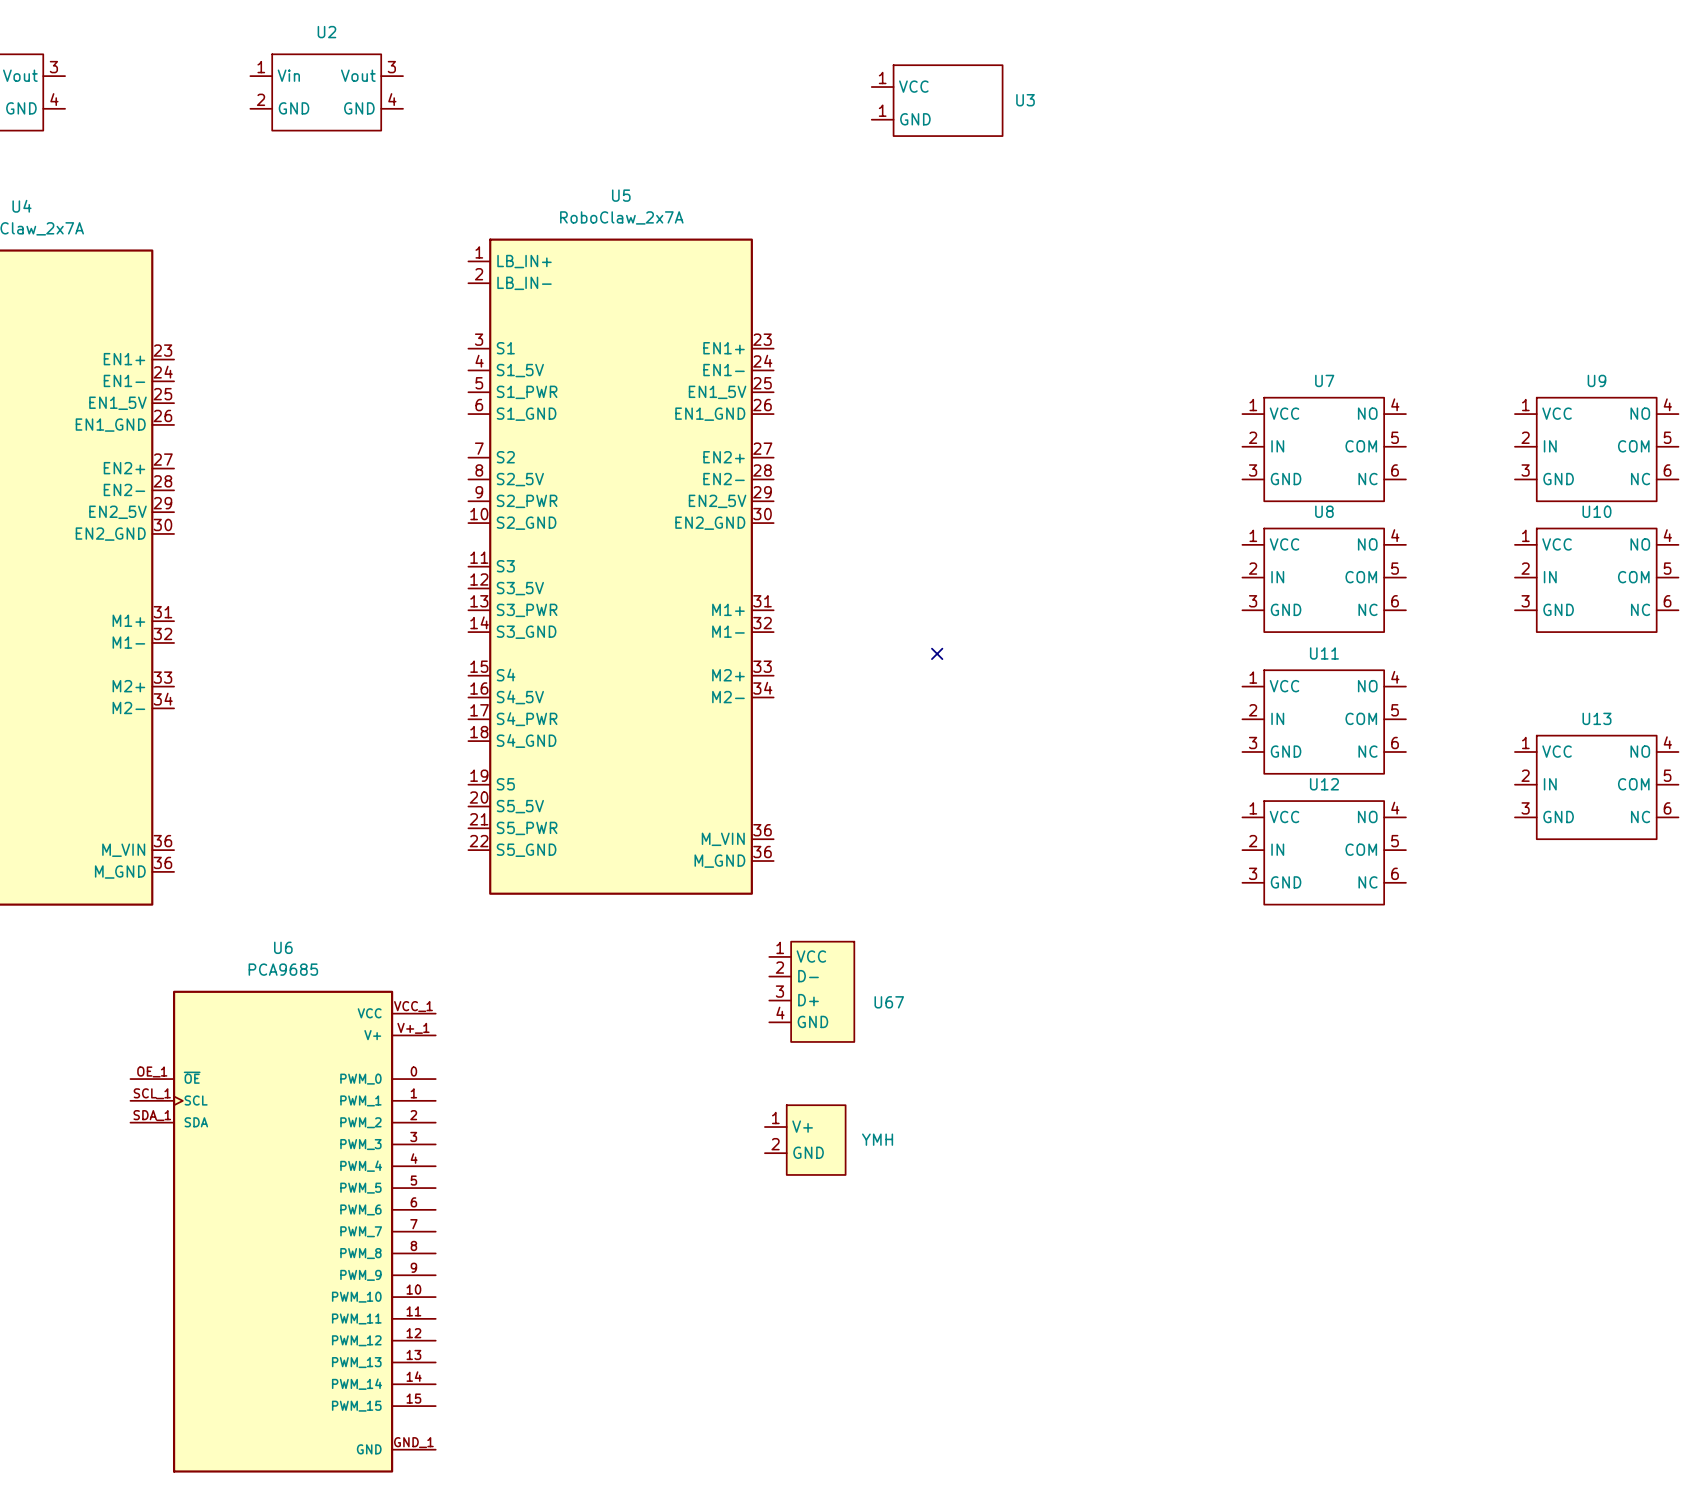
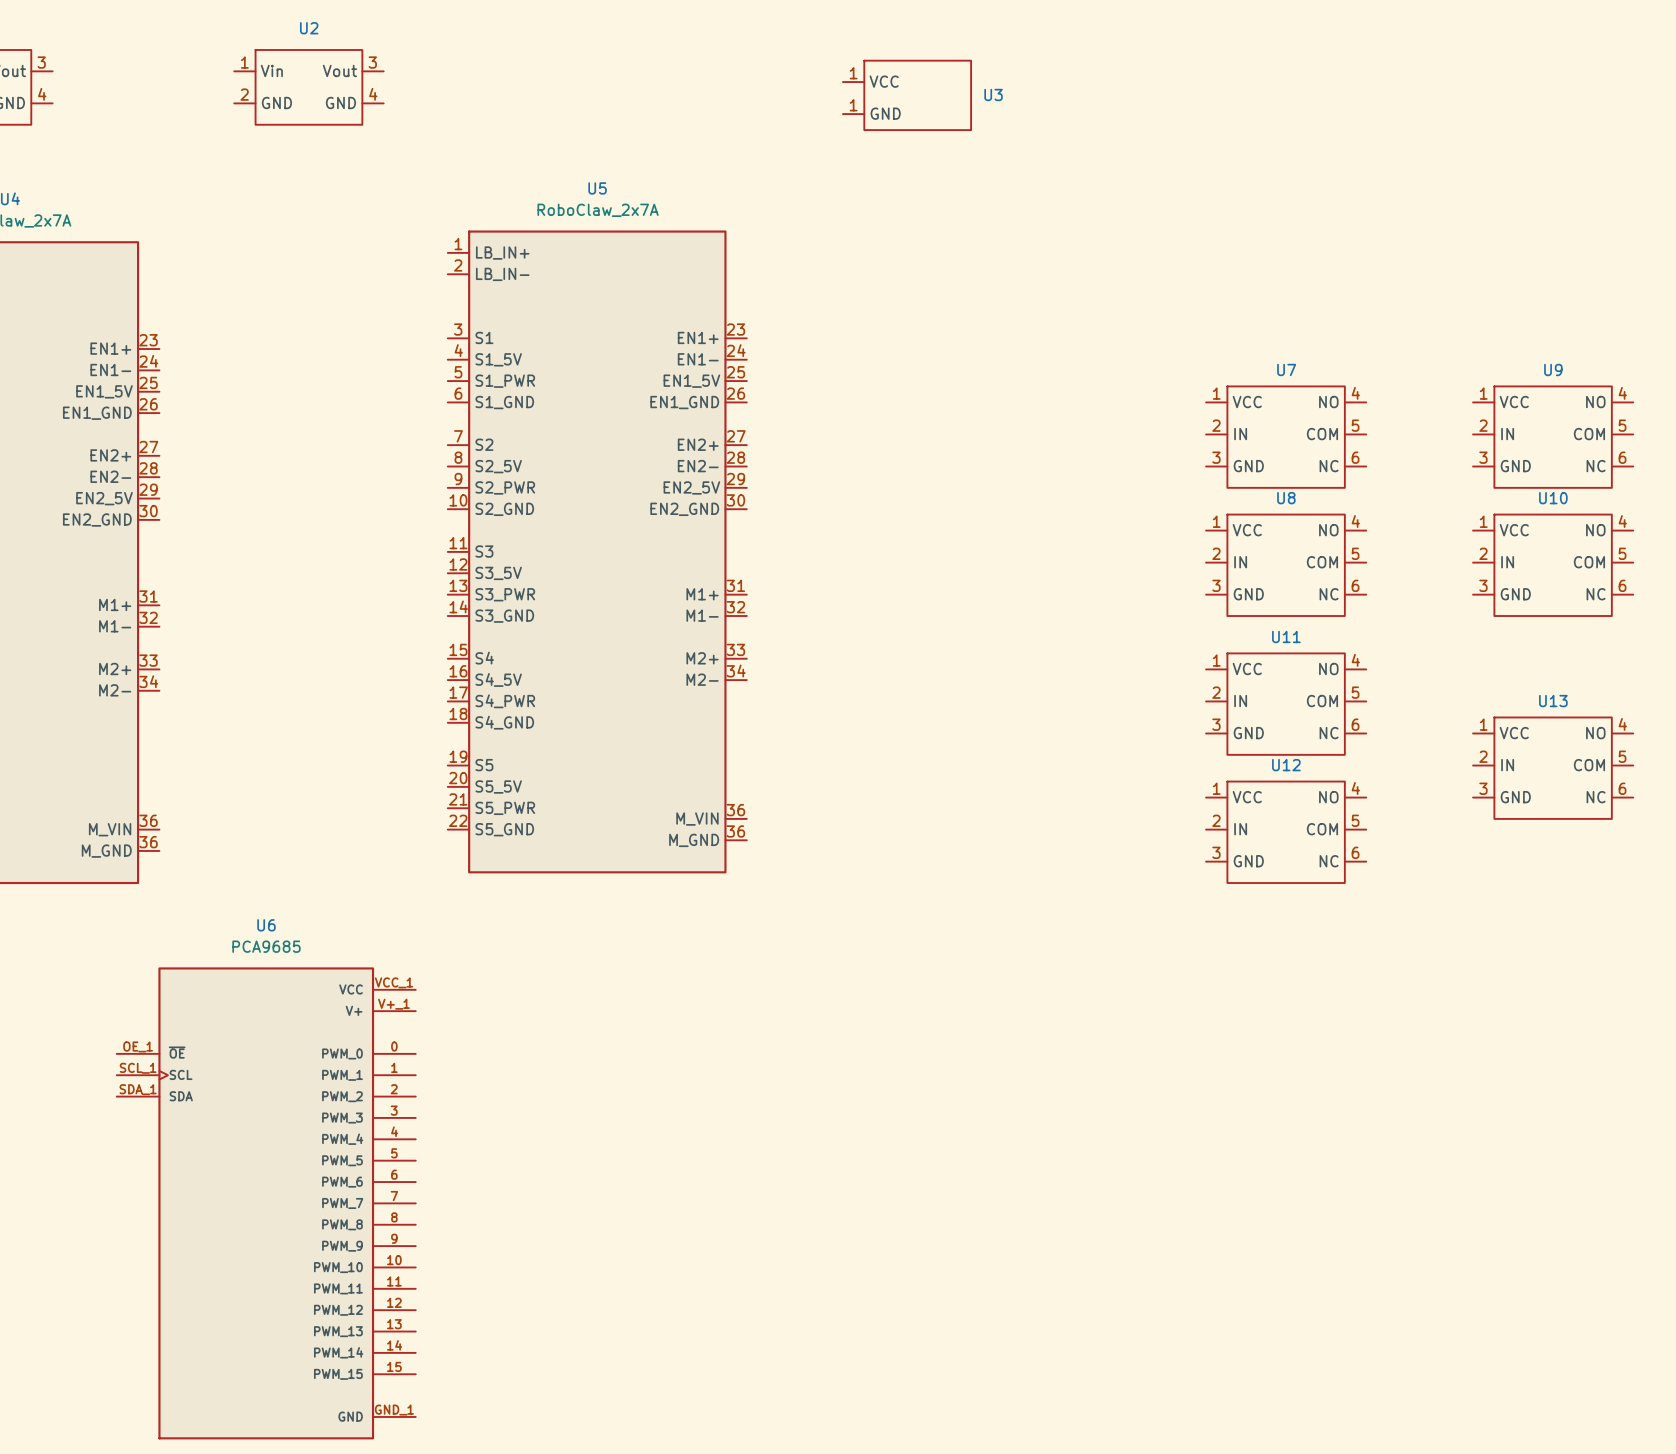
no-connect mark: (937, 653) -> none
U67: (811, 991) -> none
YMH: (805, 1140) -> none

